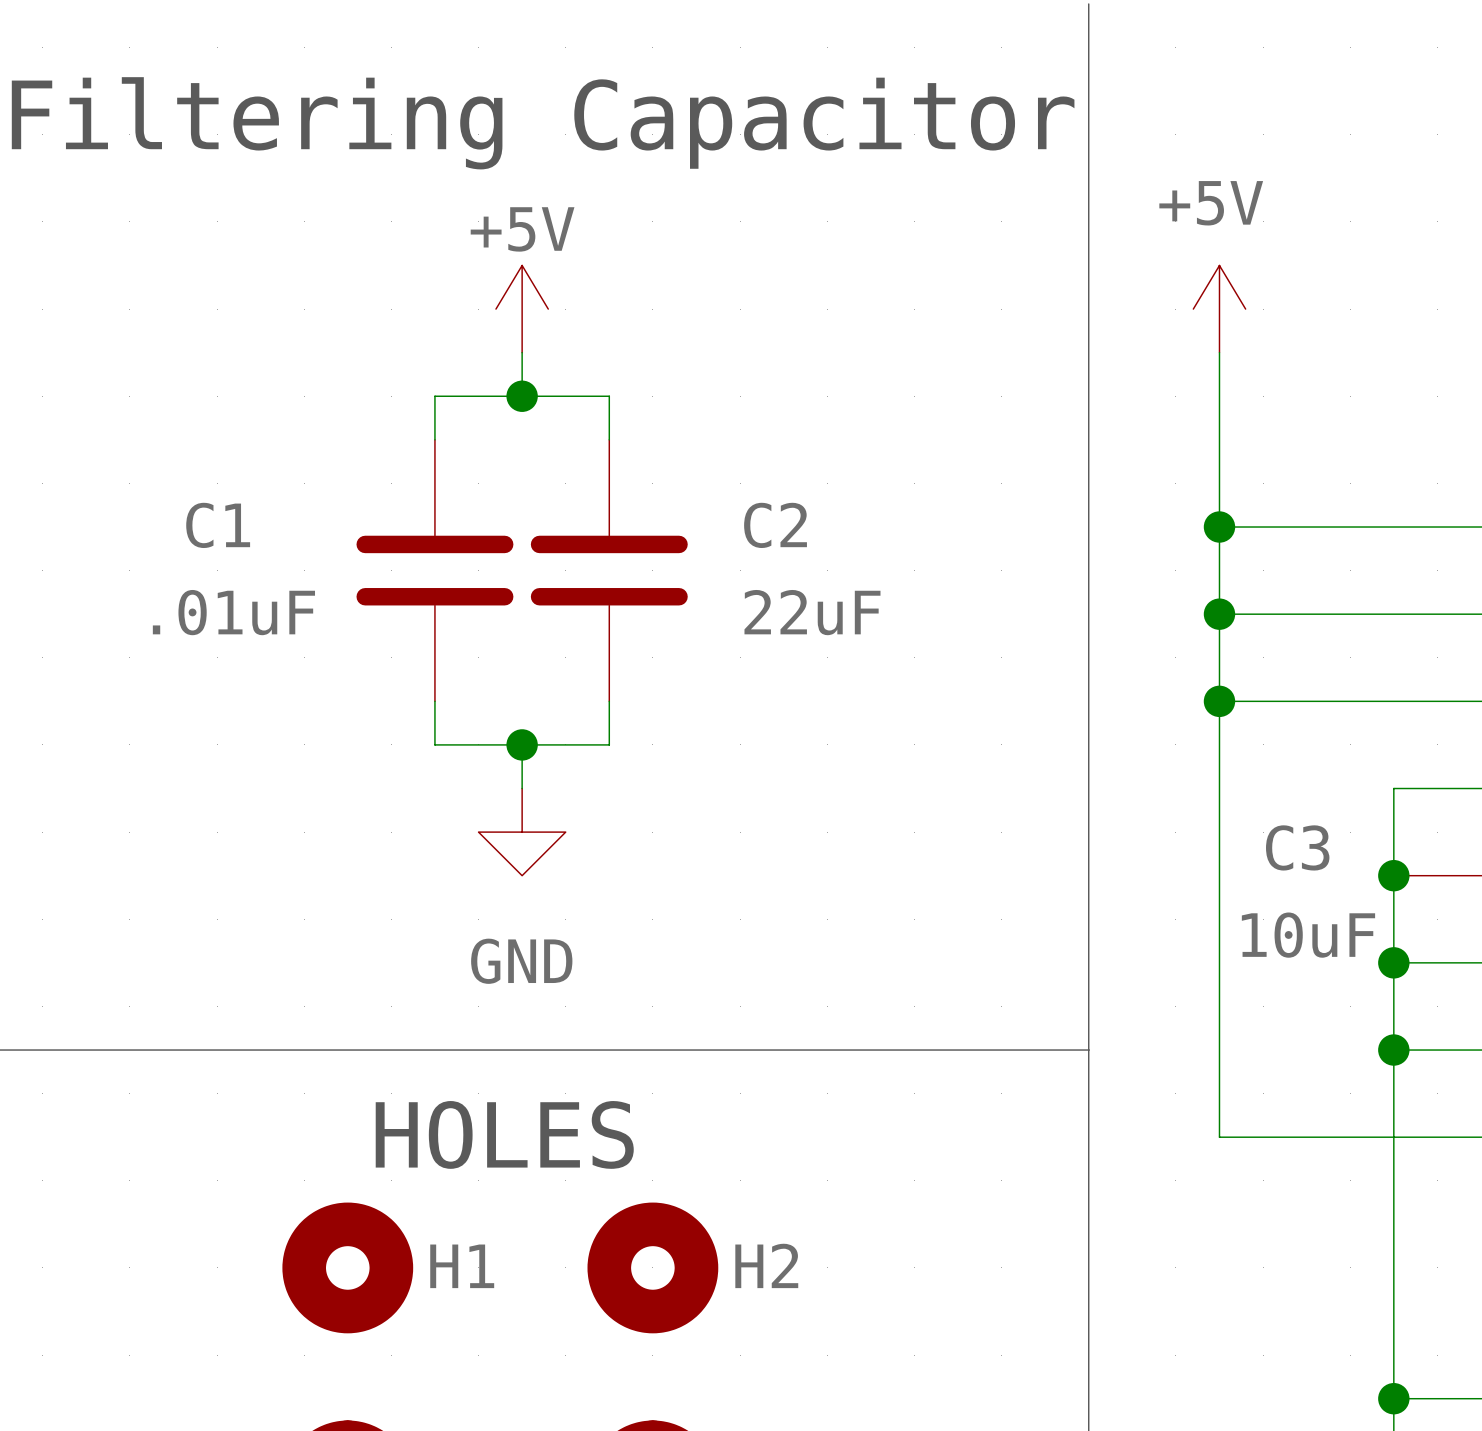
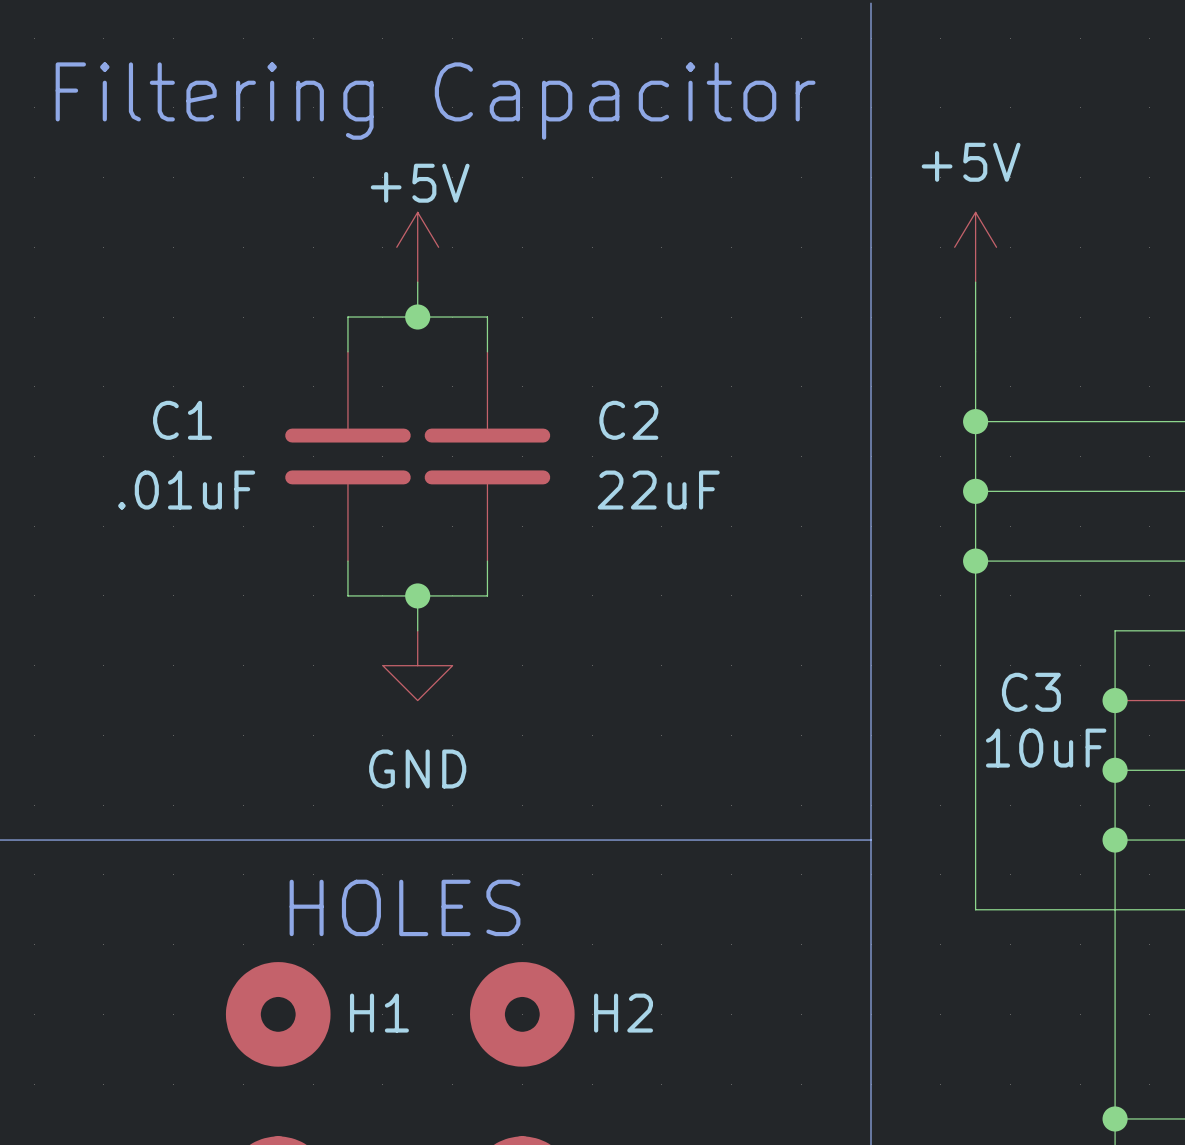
C3 name position: C3 (1297, 847) -> C3 (1031, 692)

